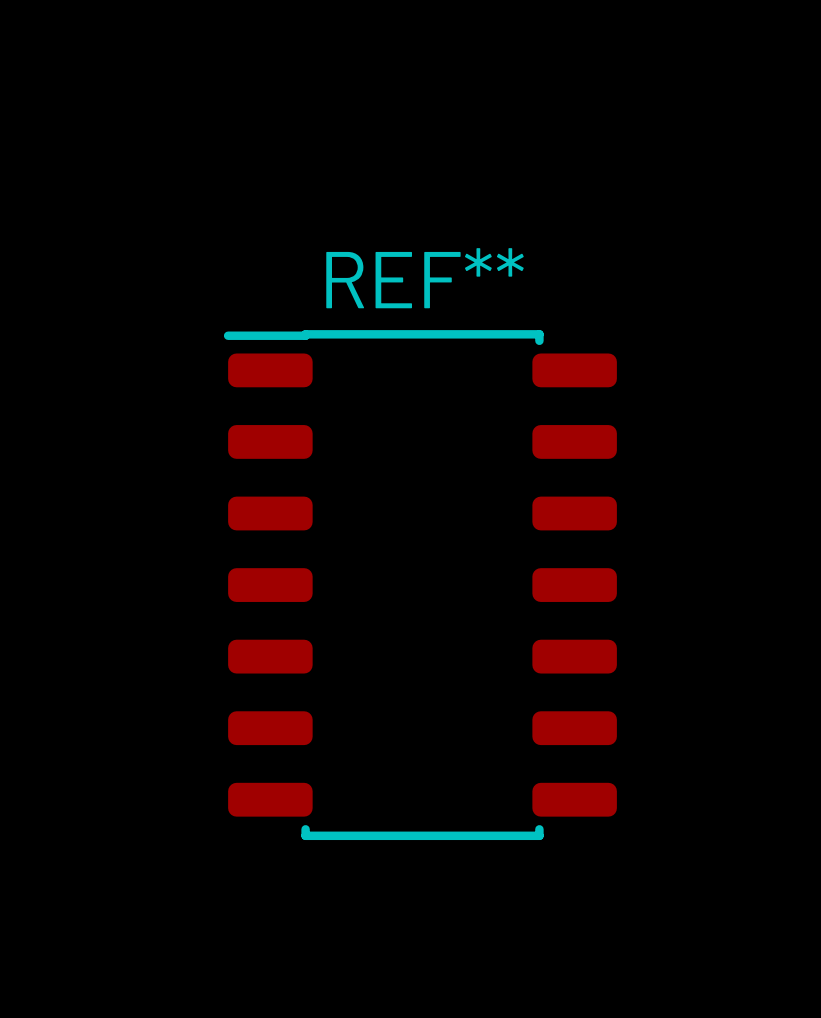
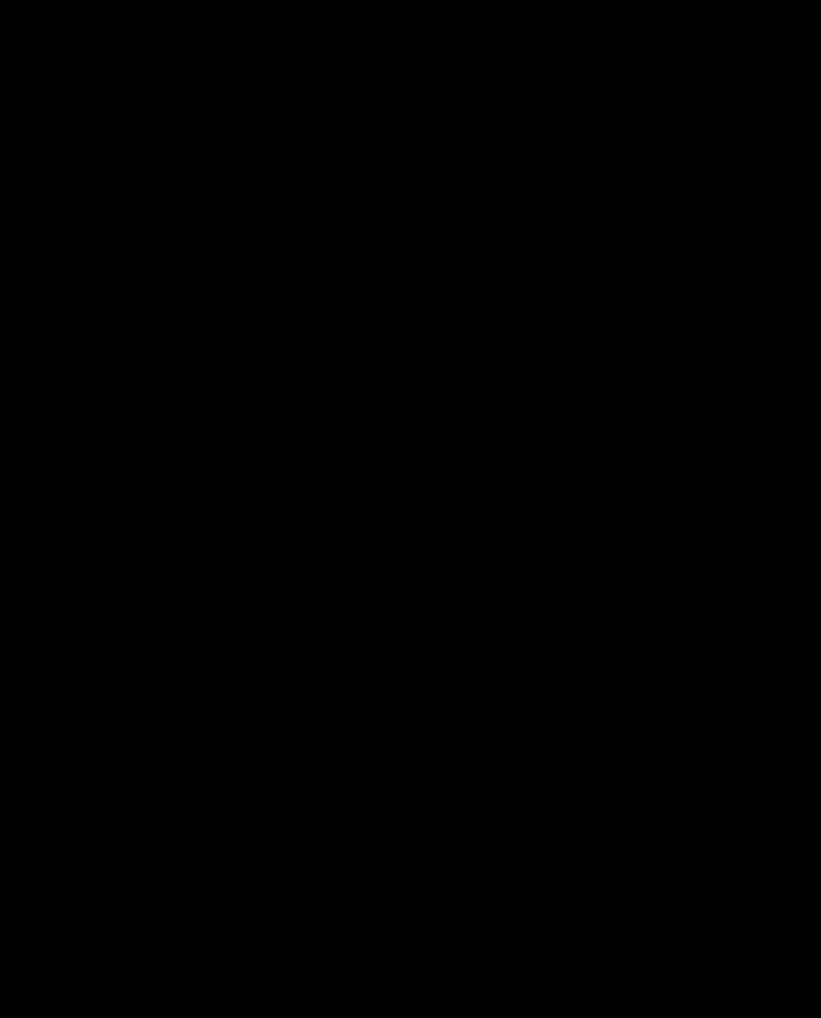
REF**: (420, 585) -> none

